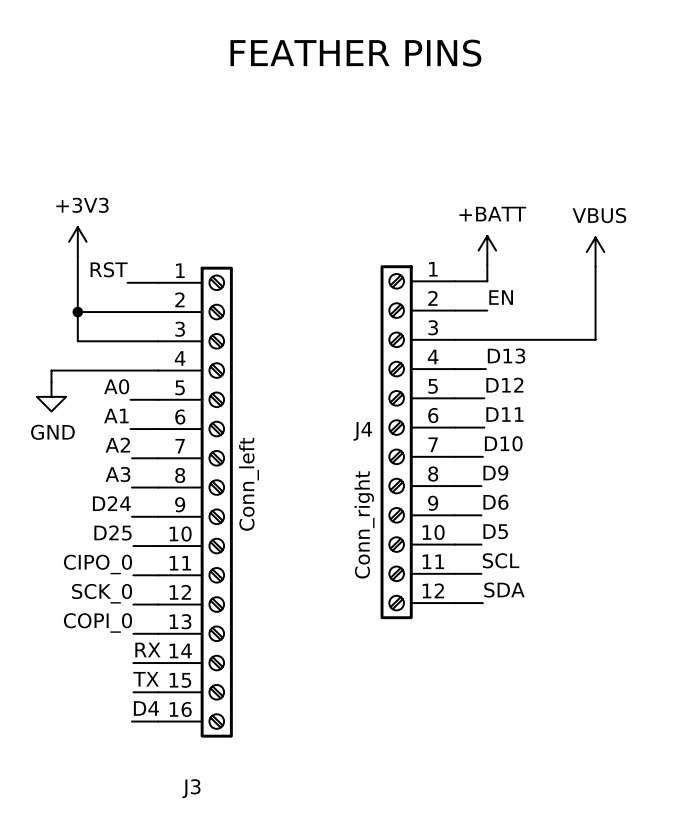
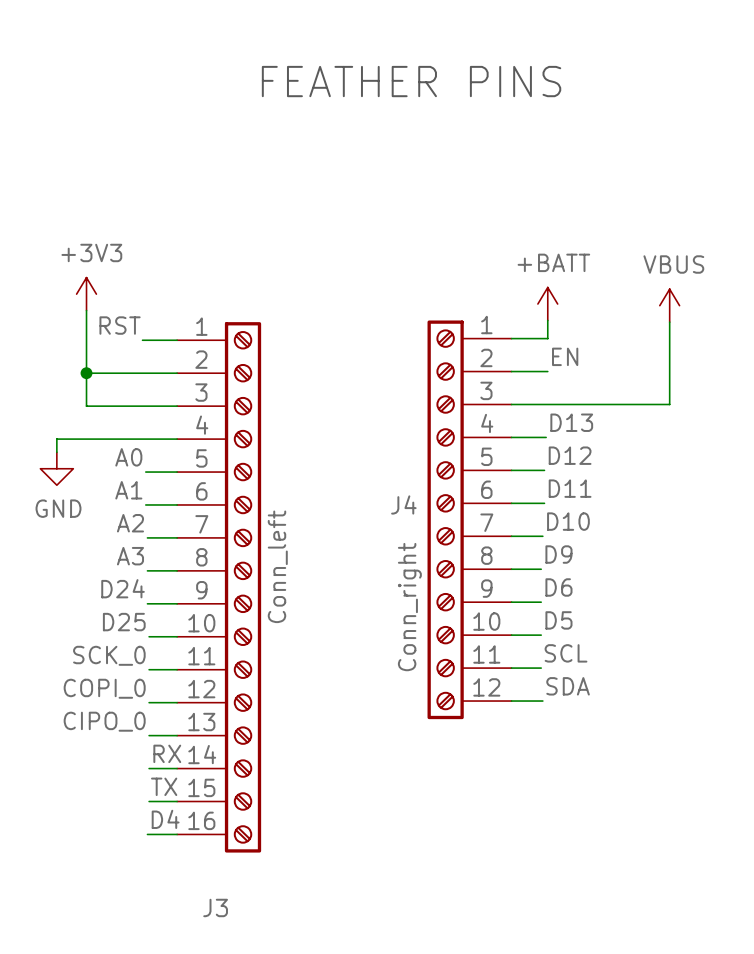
label: CIPO_0 (98, 564) -> SCK_0 (109, 655)
label: SCK_0 (102, 593) -> COPI_0 (104, 688)
label: COPI_0 (98, 622) -> CIPO_0 (104, 721)

